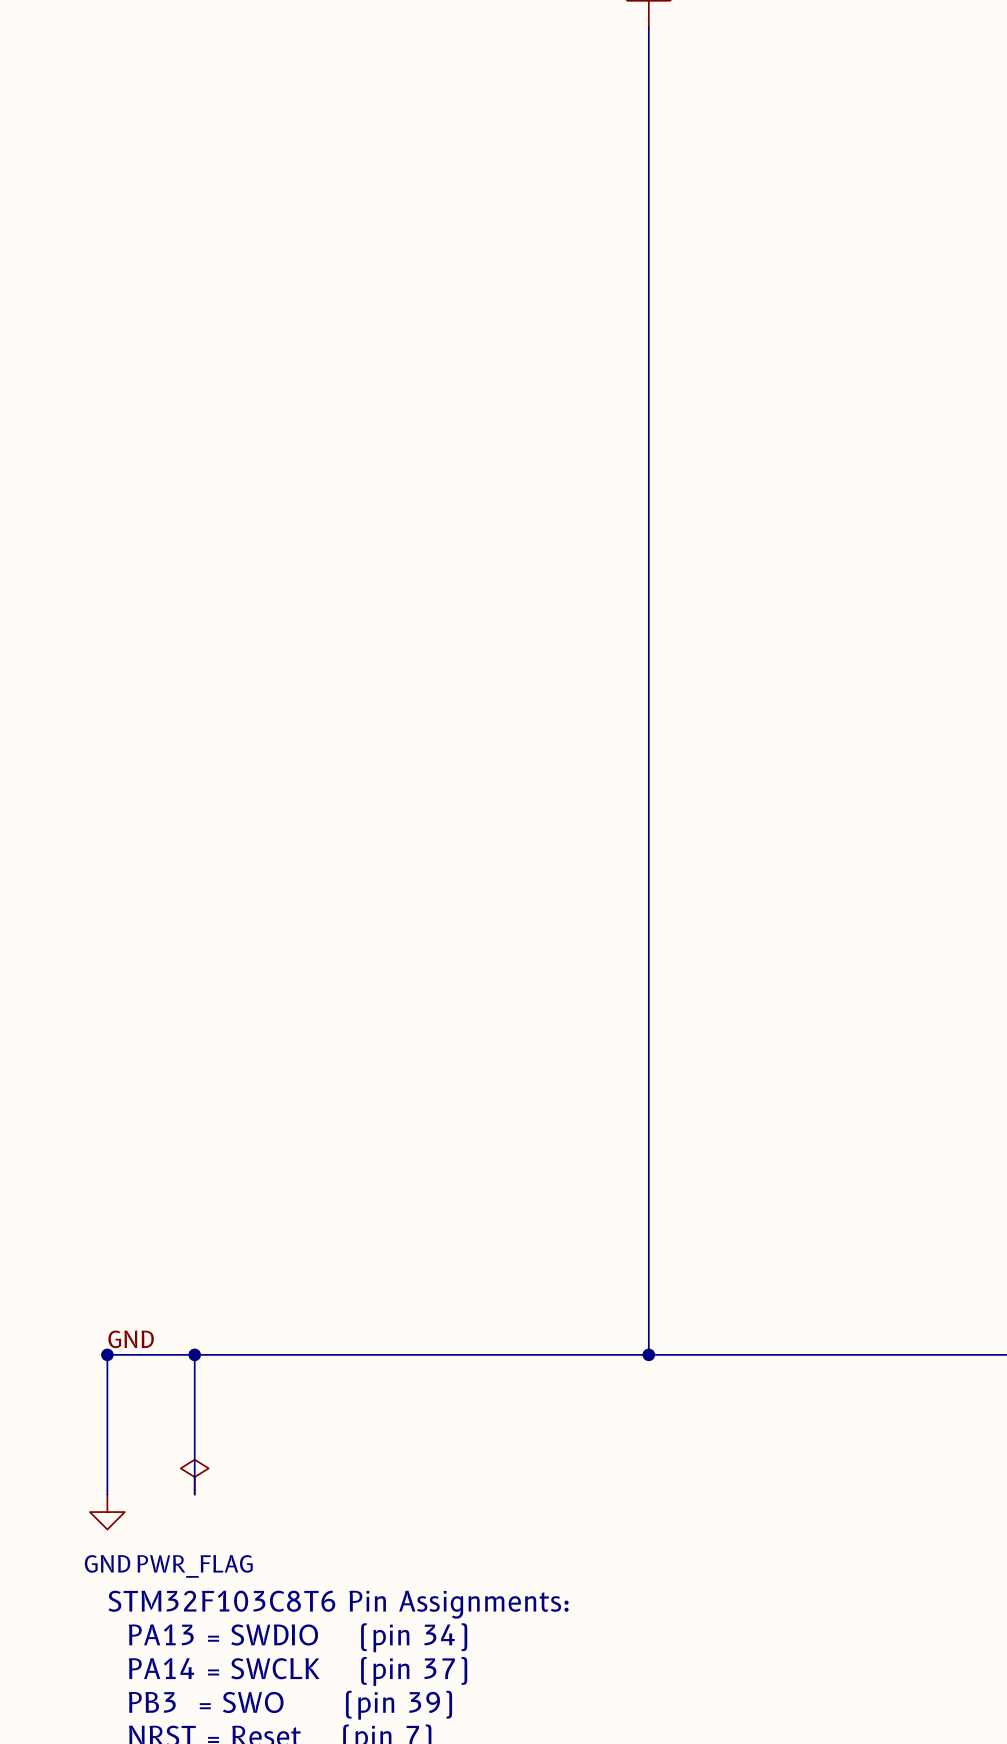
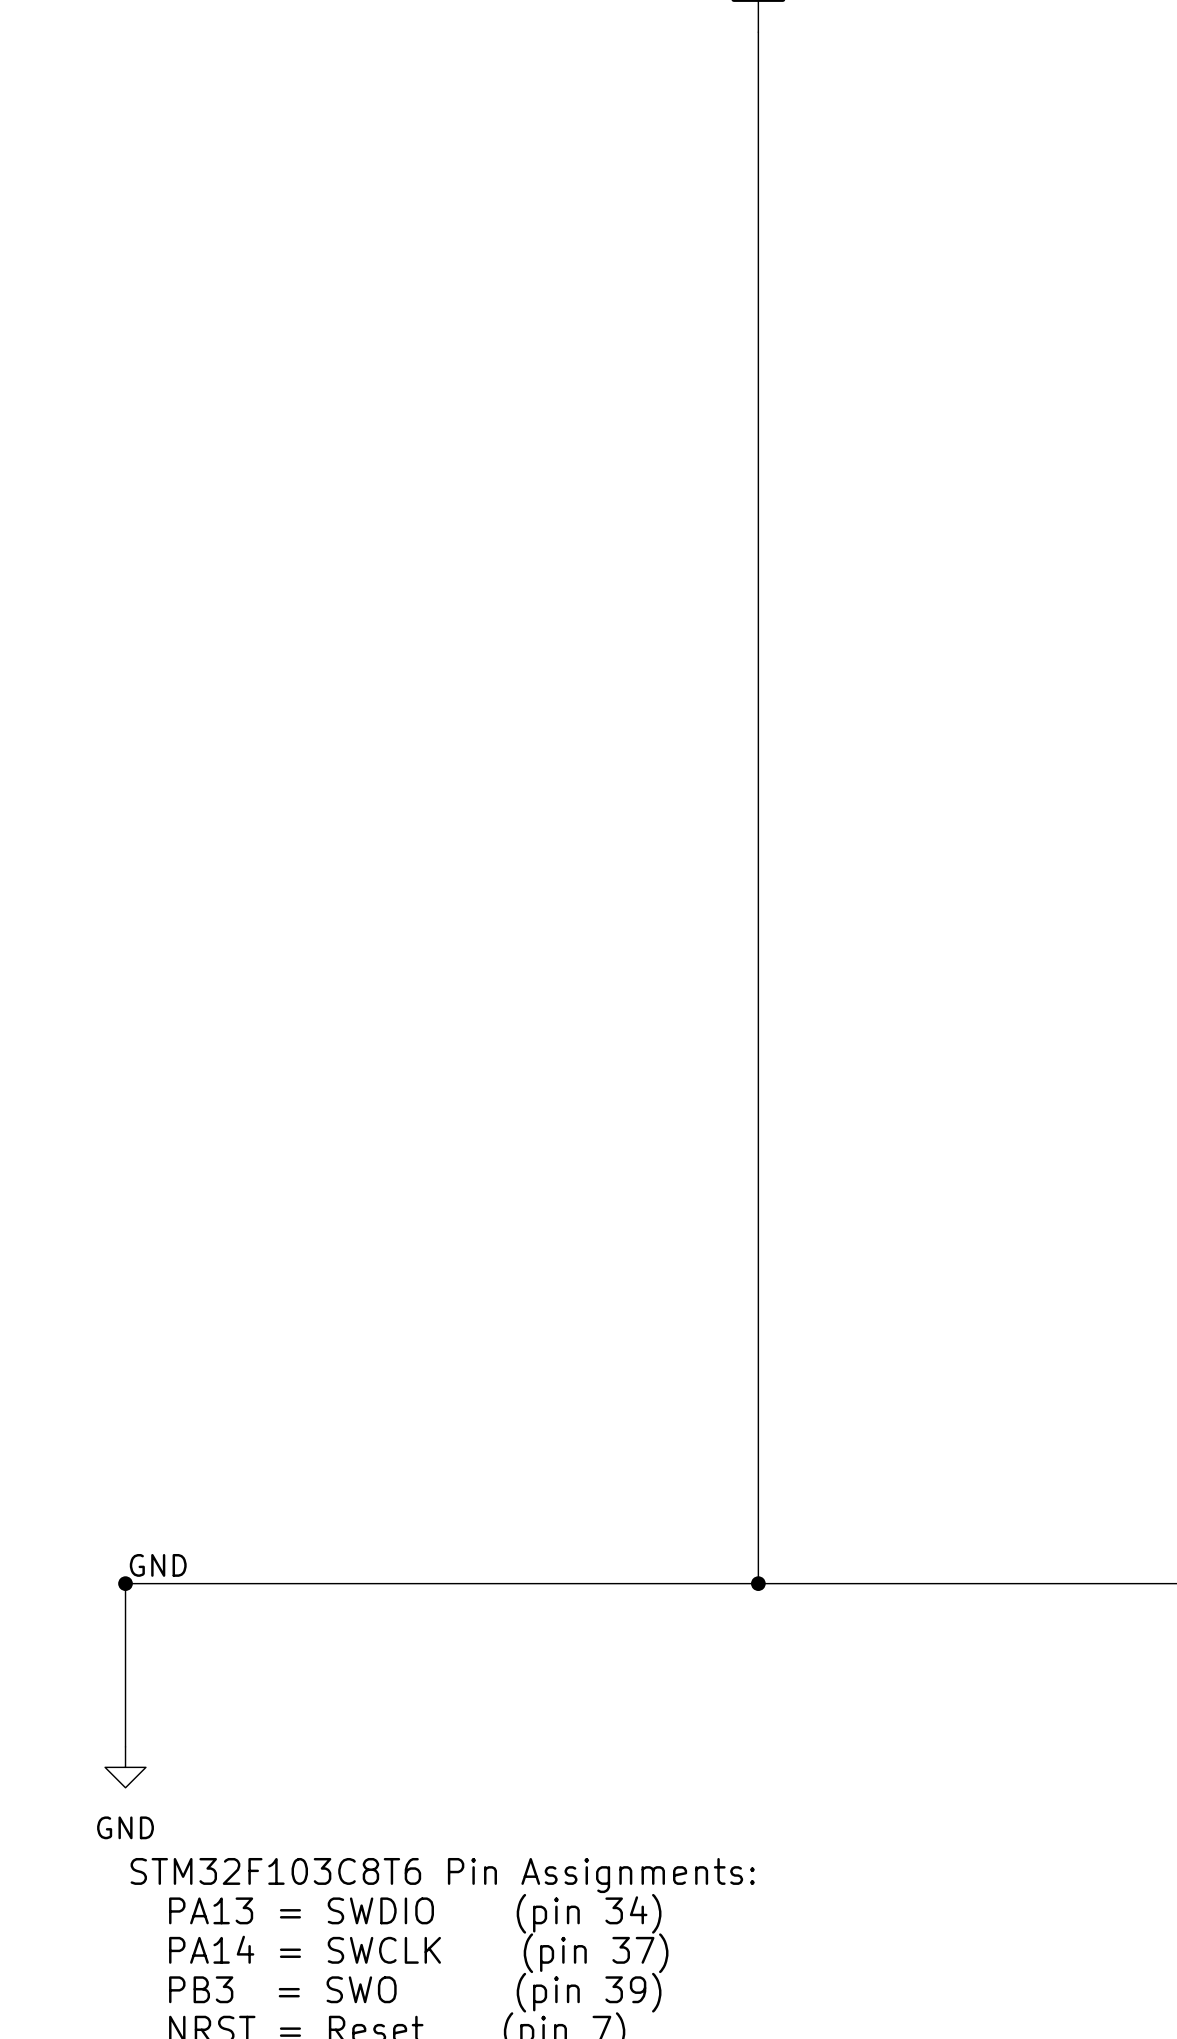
wire: (194, 1354) (194, 1494) -> none
junction: (194, 1354) -> none
power symbol: PWR_FLAG (194, 1477) -> none

